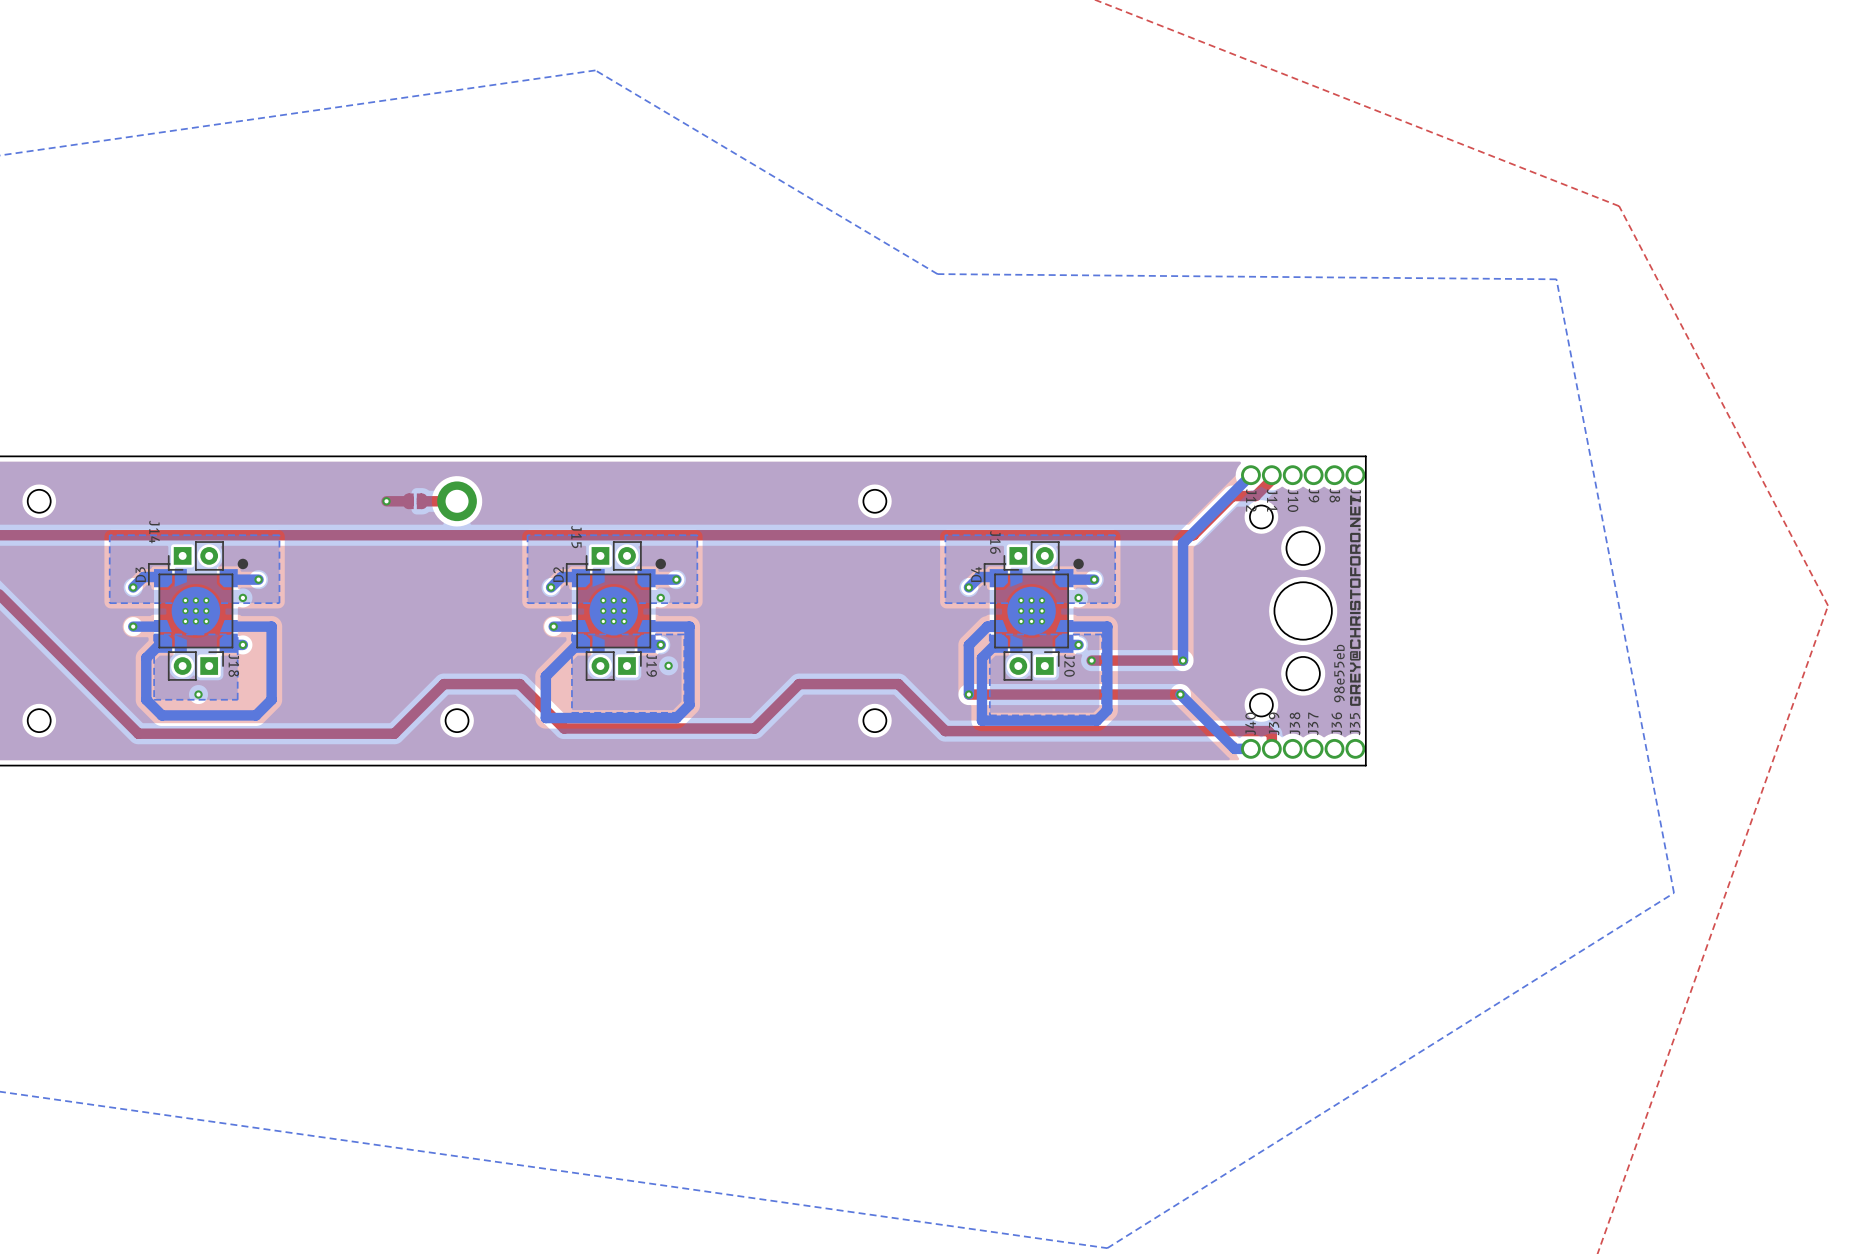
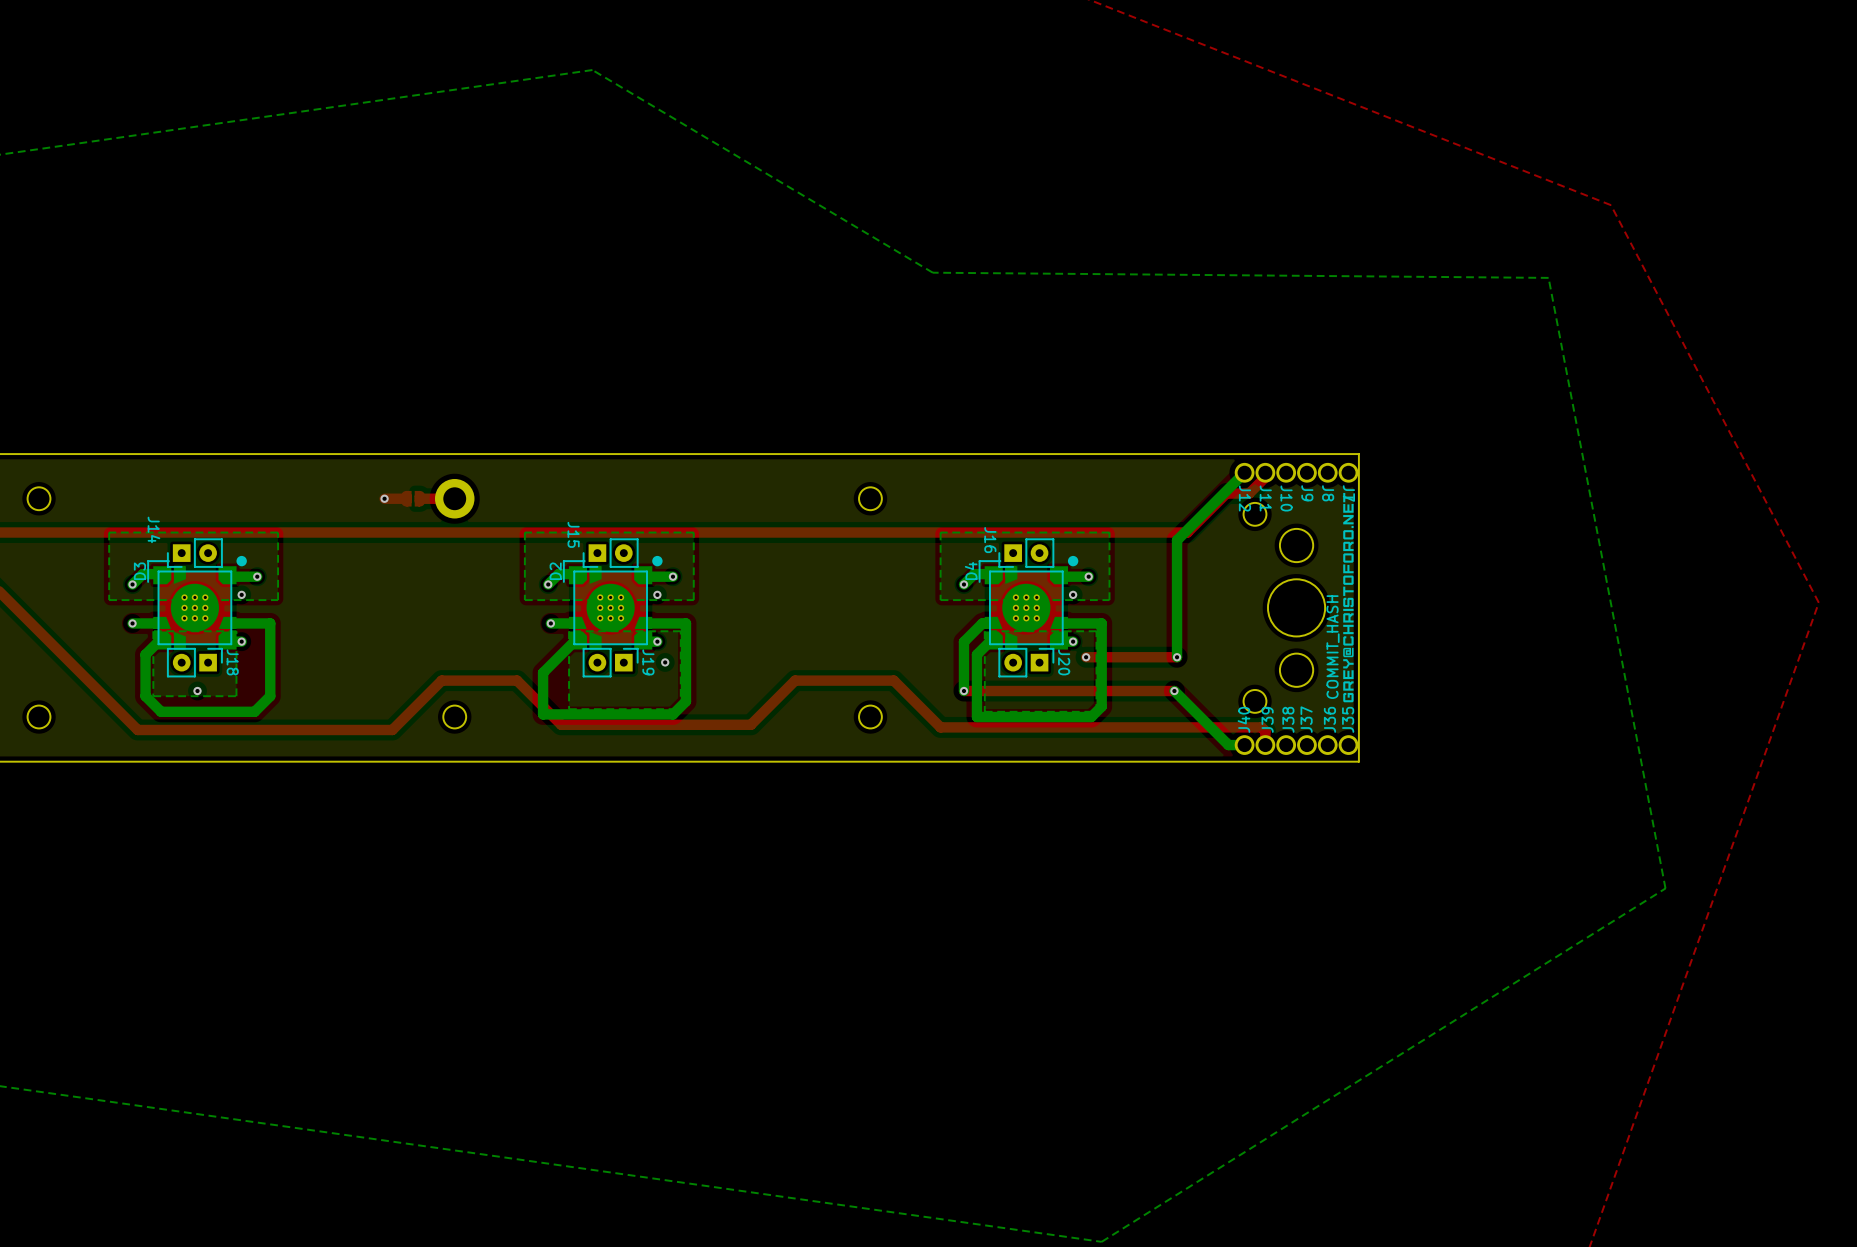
text: none -> COMMIT_HASH (1333, 647)
text: 98e55eb (1339, 673) -> none

